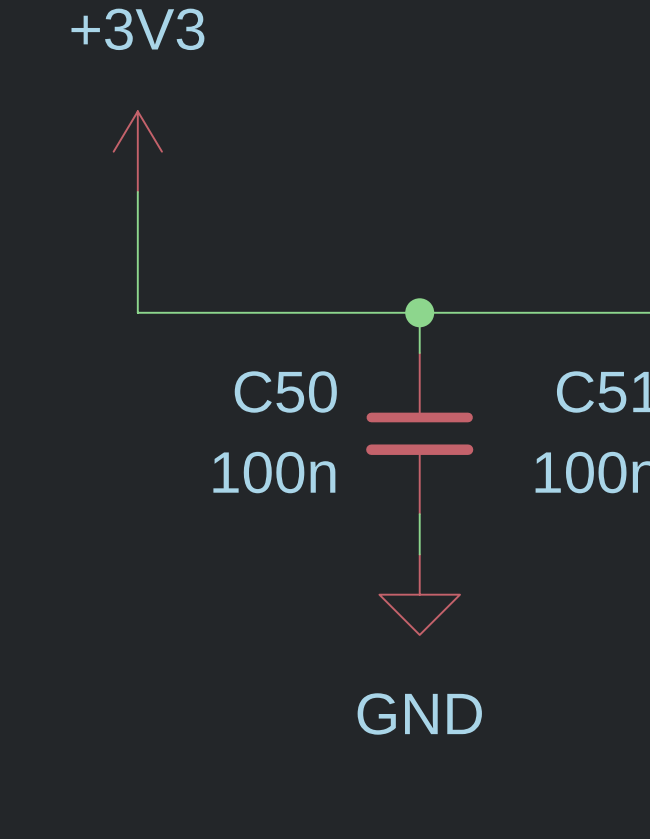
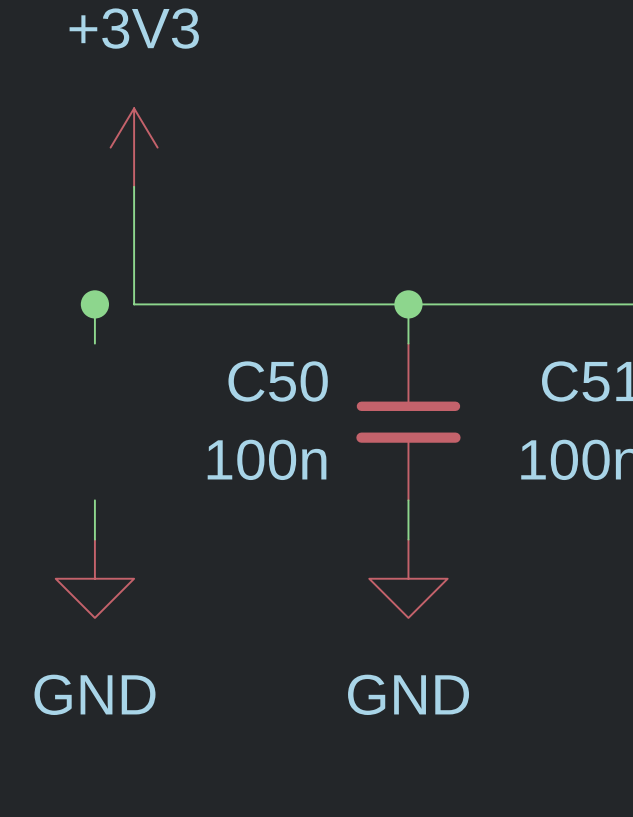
wire: none -> (94, 304) (94, 343)
junction: none -> (94, 304)
wire: none -> (94, 500) (94, 539)
power symbol: none -> GND (94, 578)

